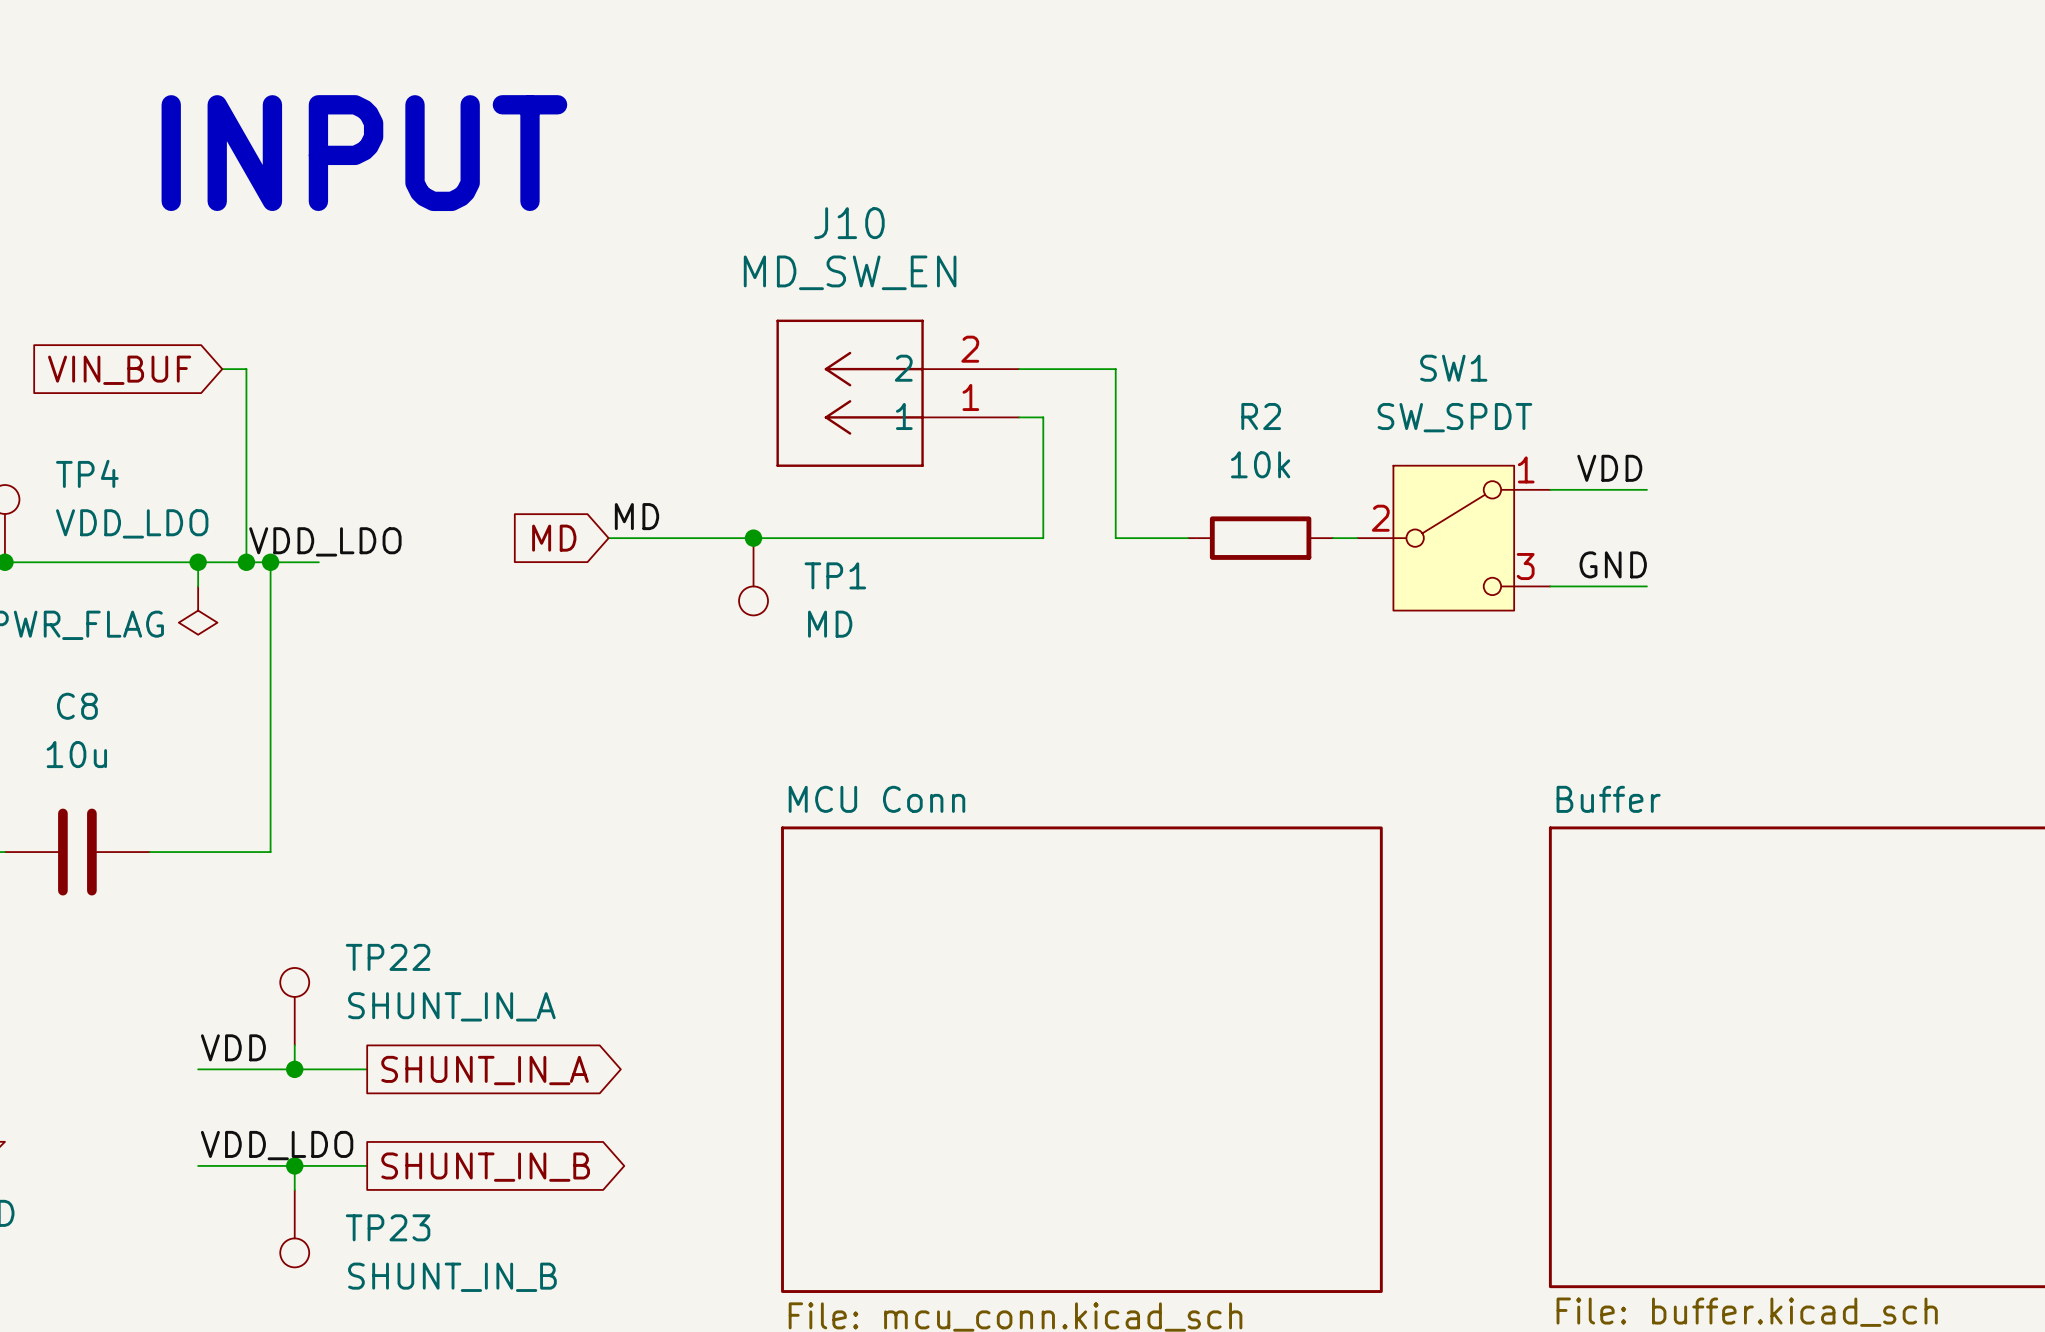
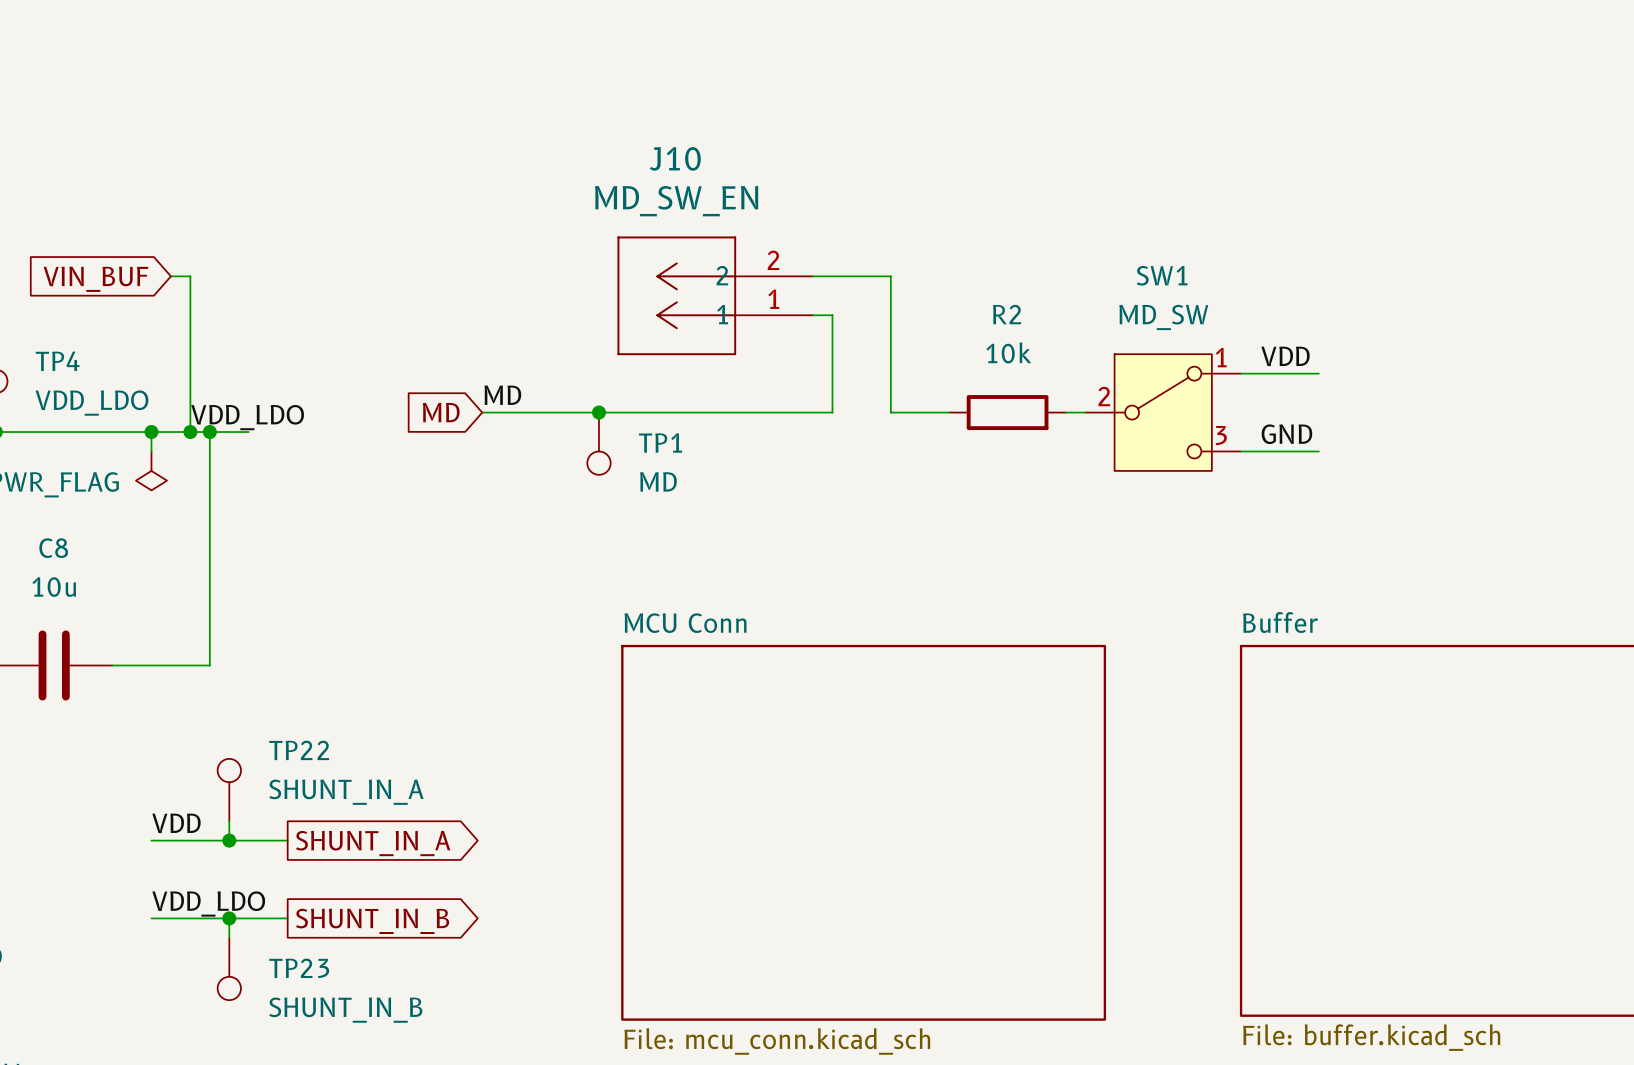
text: INPUT (364, 153) -> none
SW1 value: SW_SPDT (1454, 417) -> MD_SW (1163, 317)

